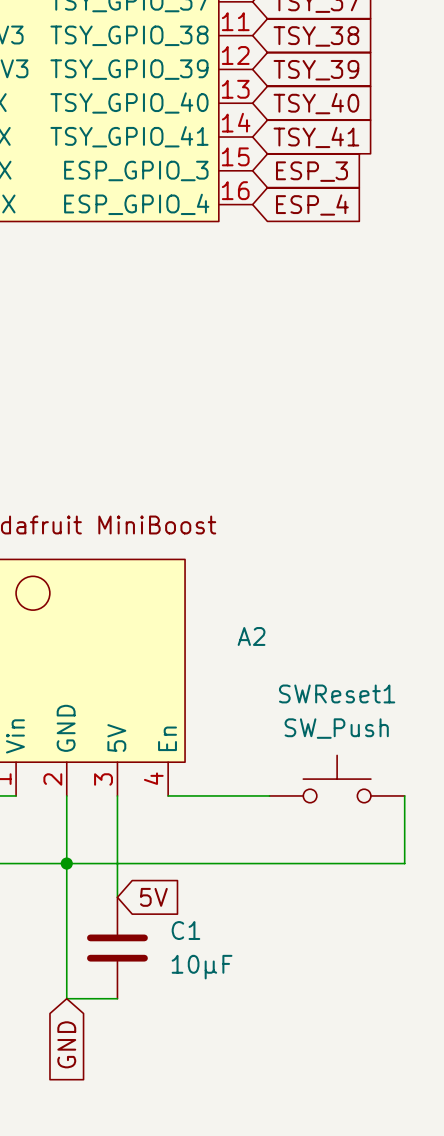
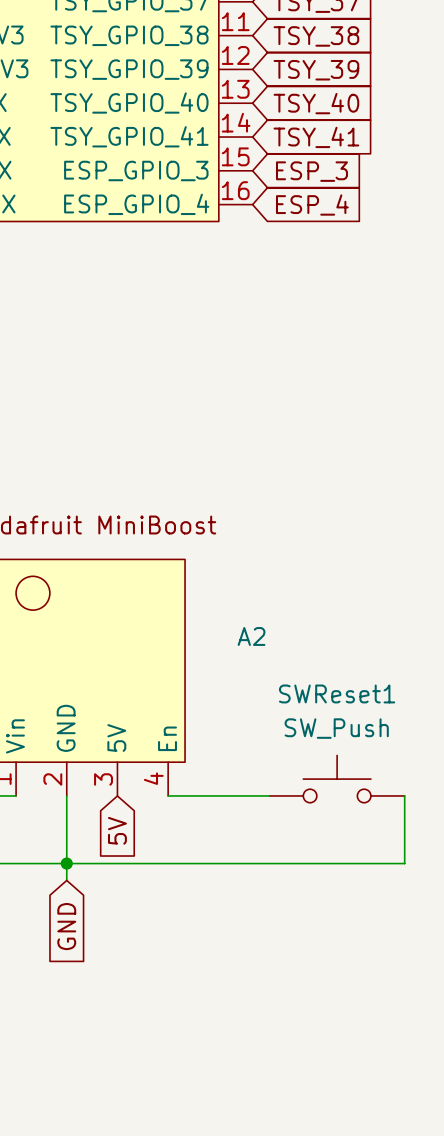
wire: (117, 795) (117, 897) -> none
wire: (66, 880) (66, 998) (117, 998) -> none
global label rotation: 0° (153, 897) -> 90° clockwise (117, 830)
C1: 10µF (117, 948) -> none
global label position: GND (66, 1044) -> GND (66, 926)

